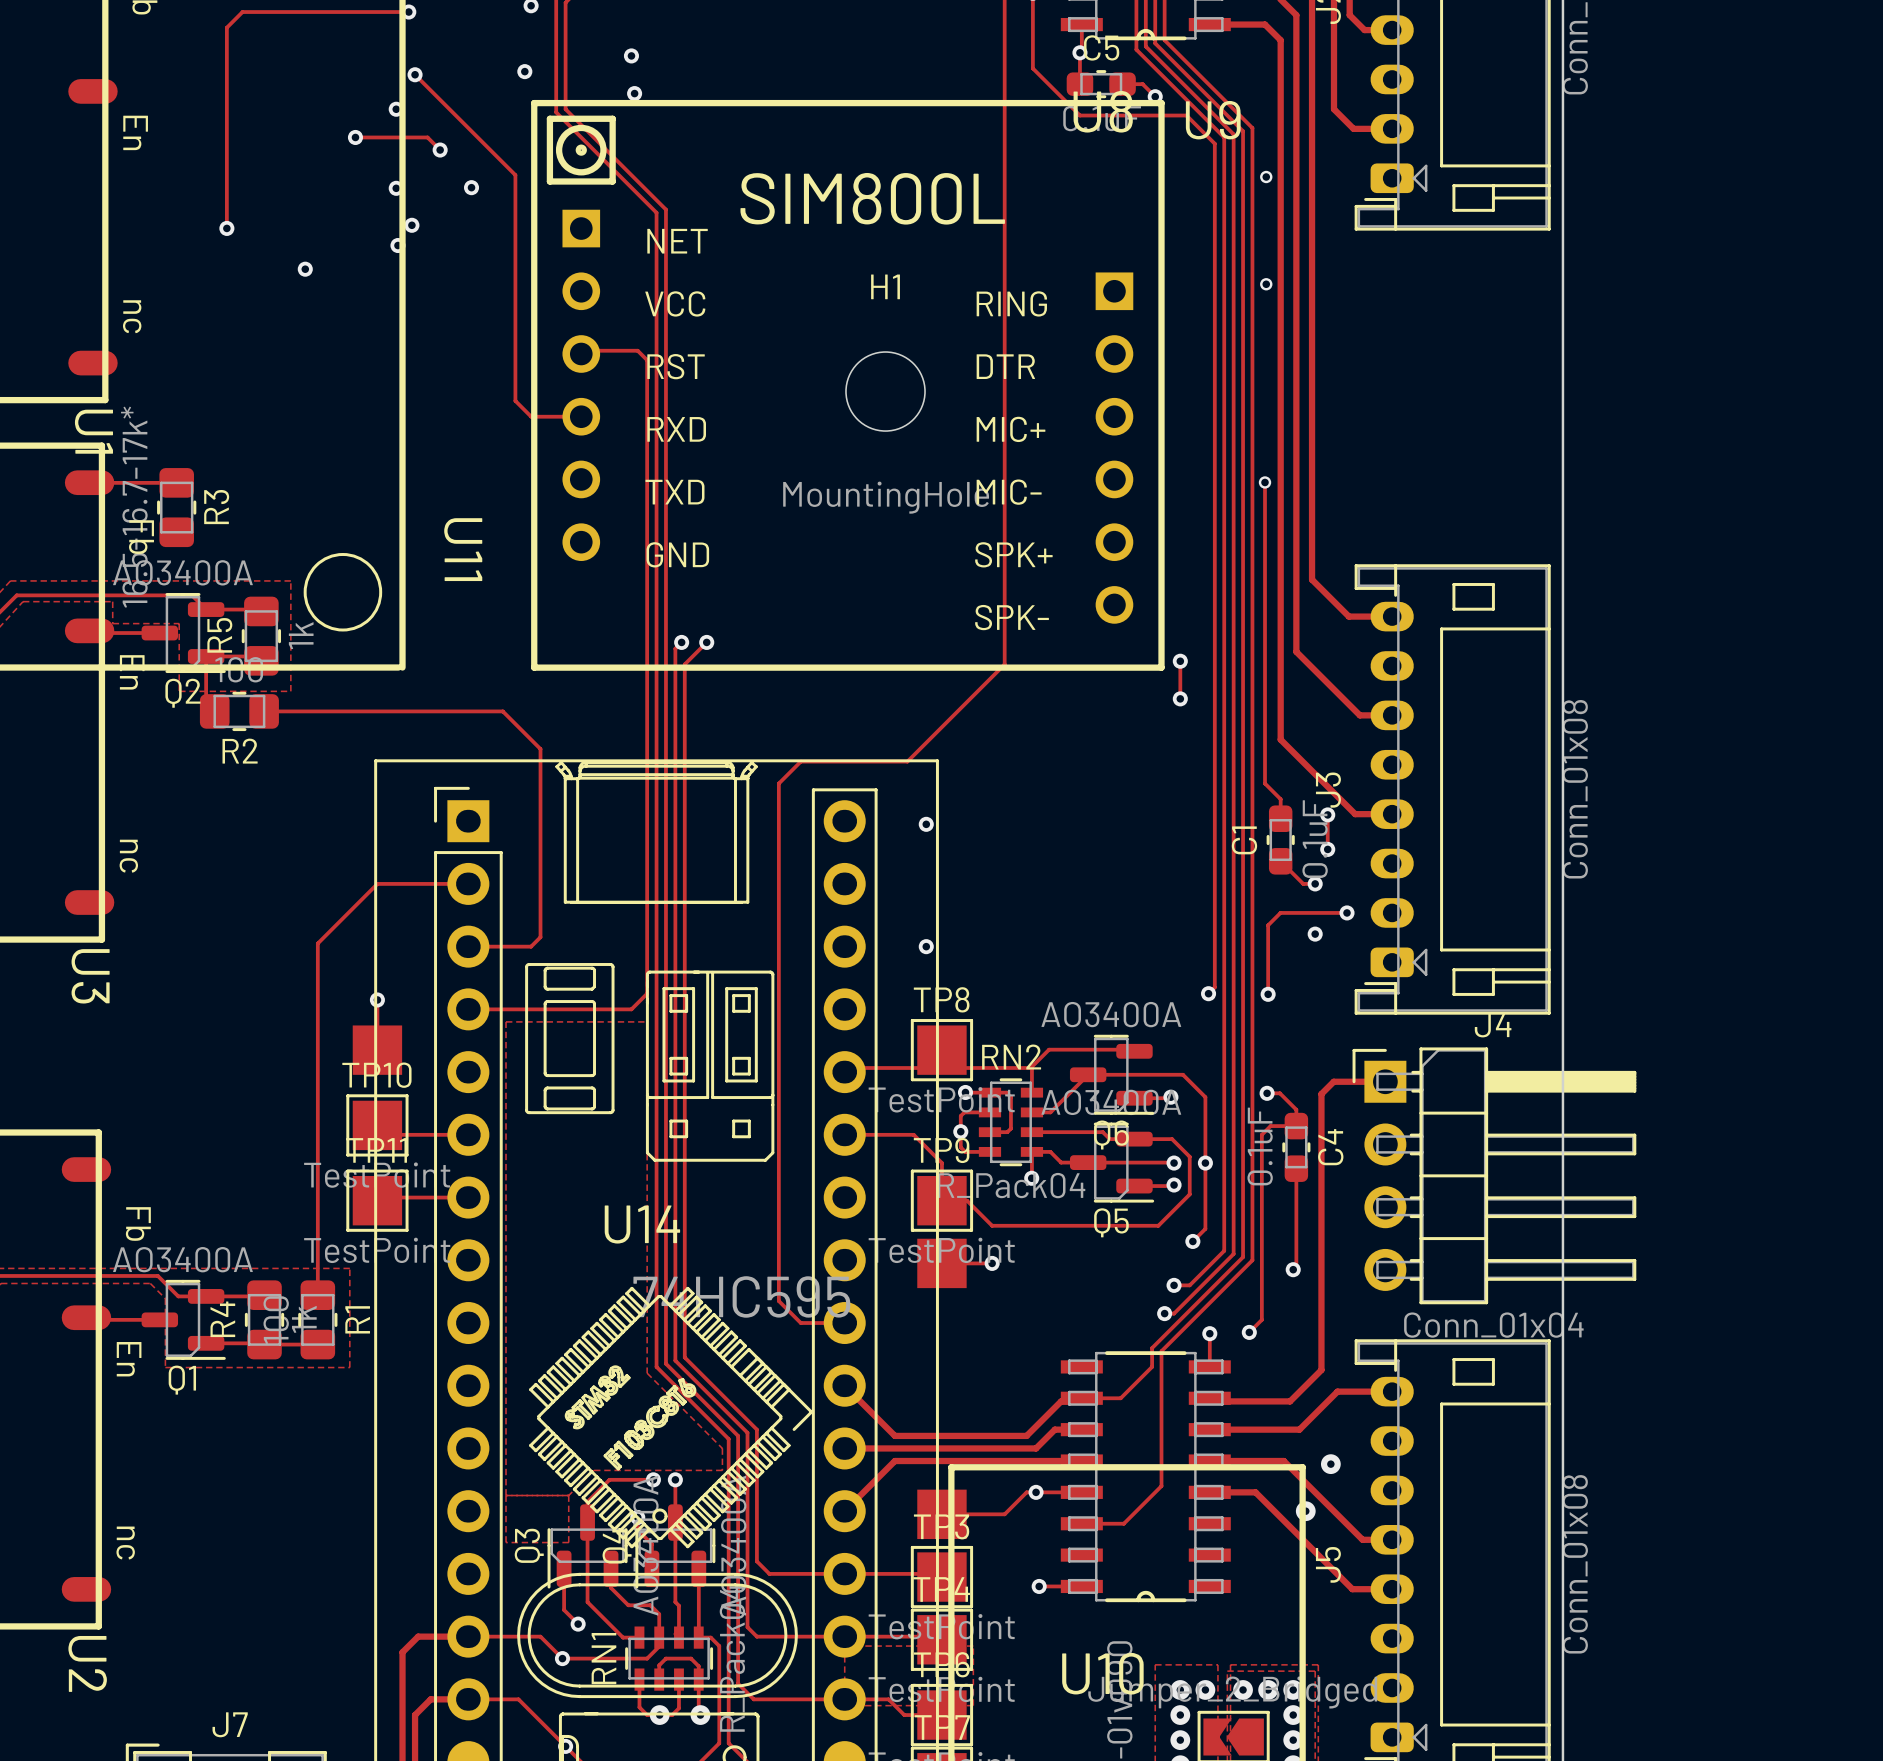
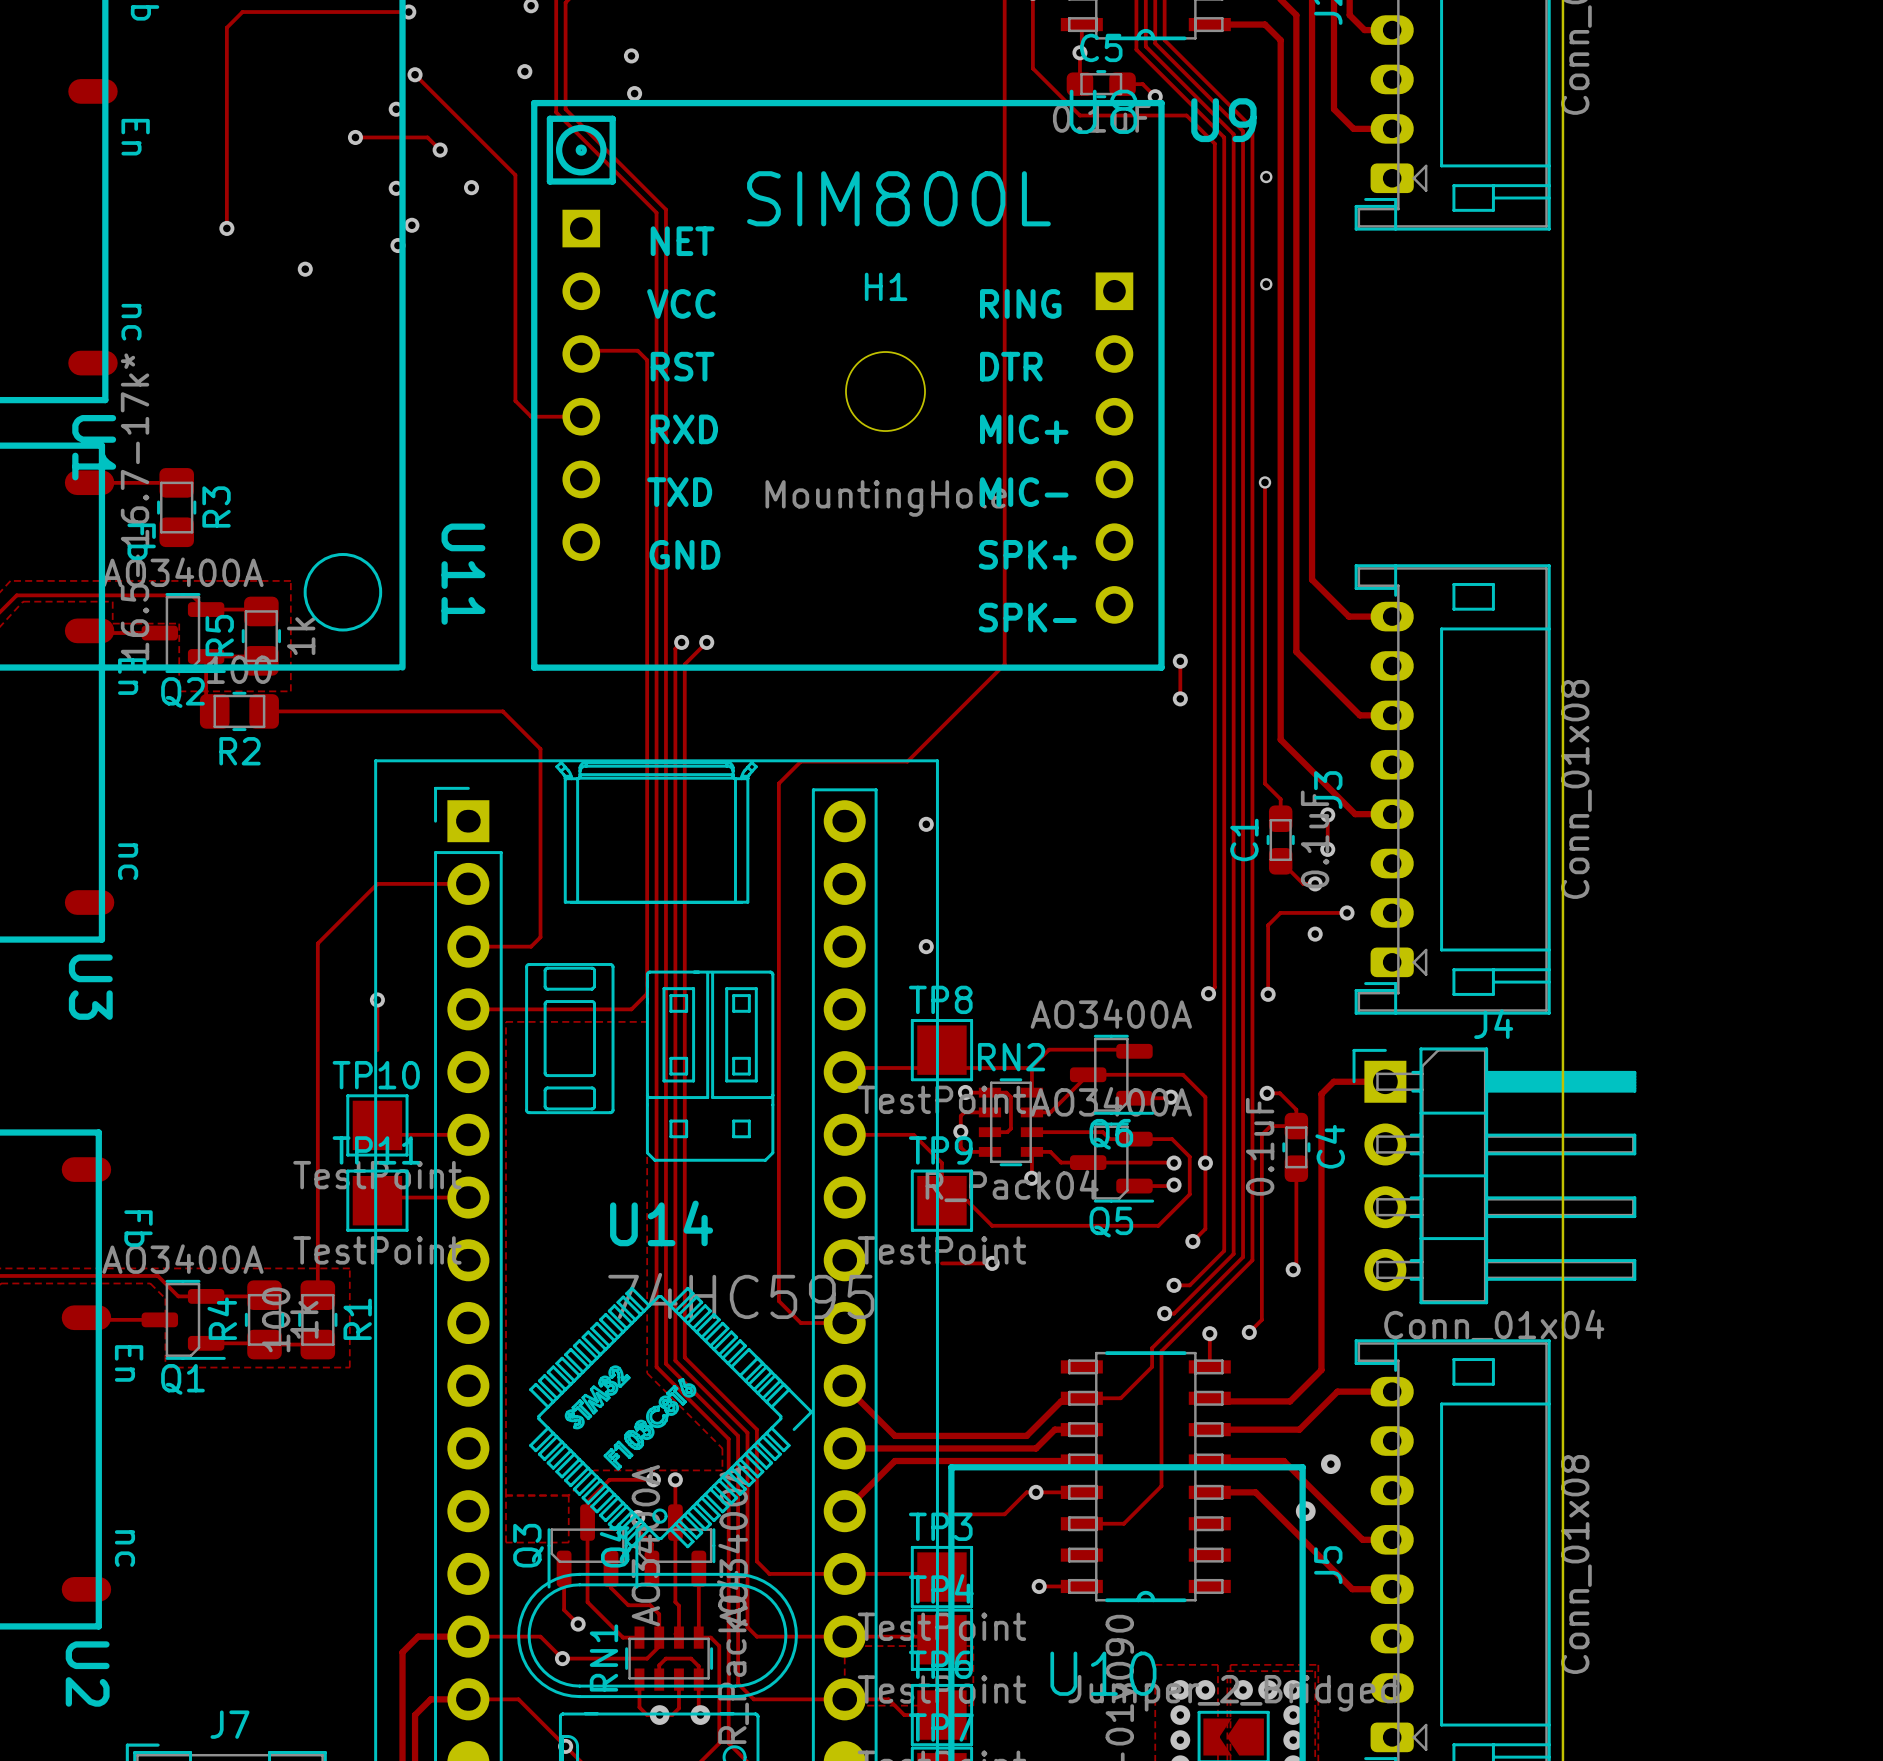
part: (377, 1050) -> none
part: (941, 1263) -> none
part: (941, 1514) -> none

